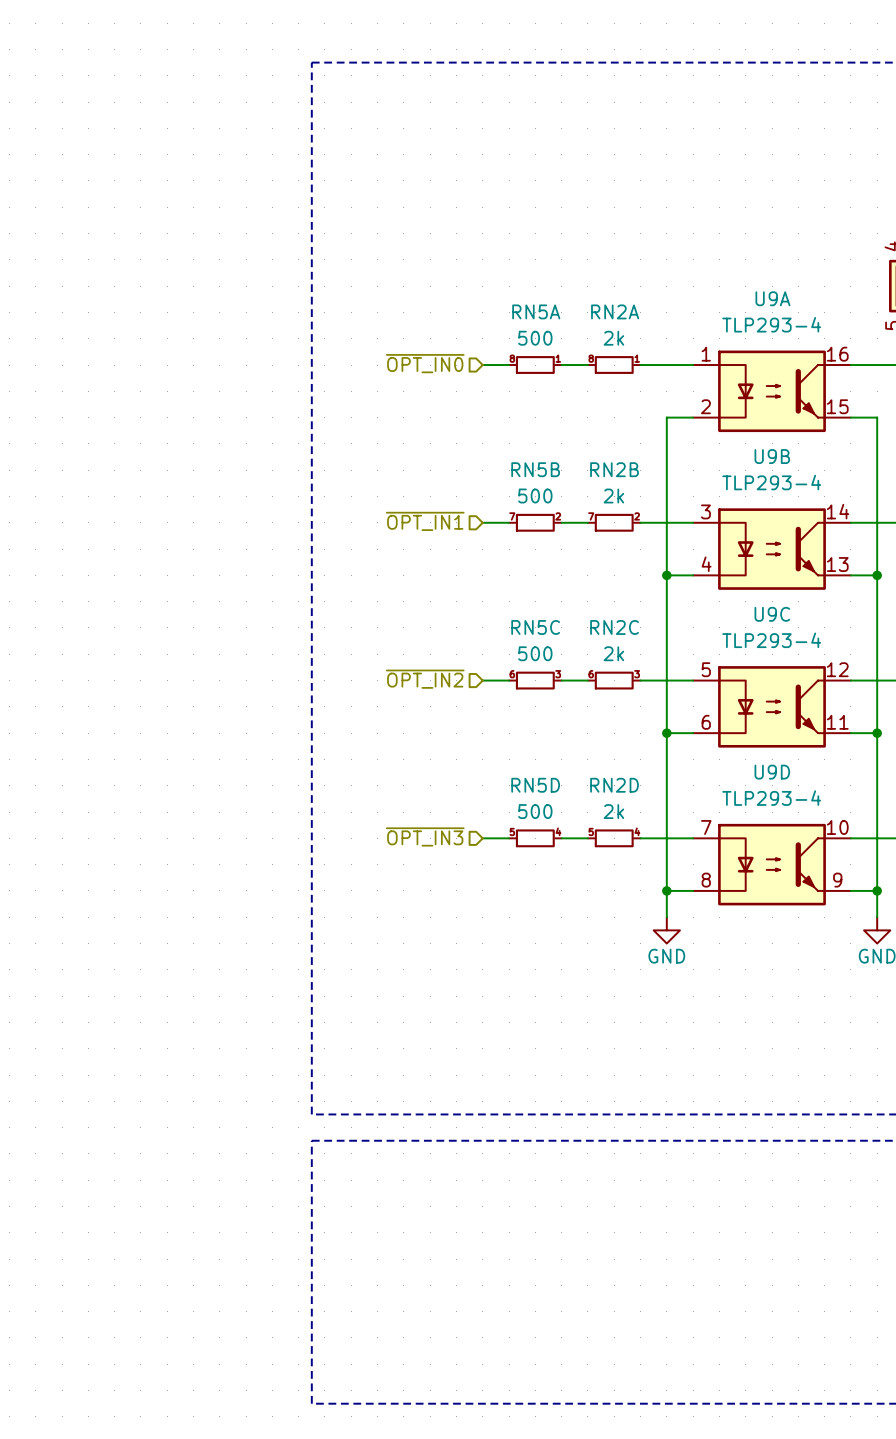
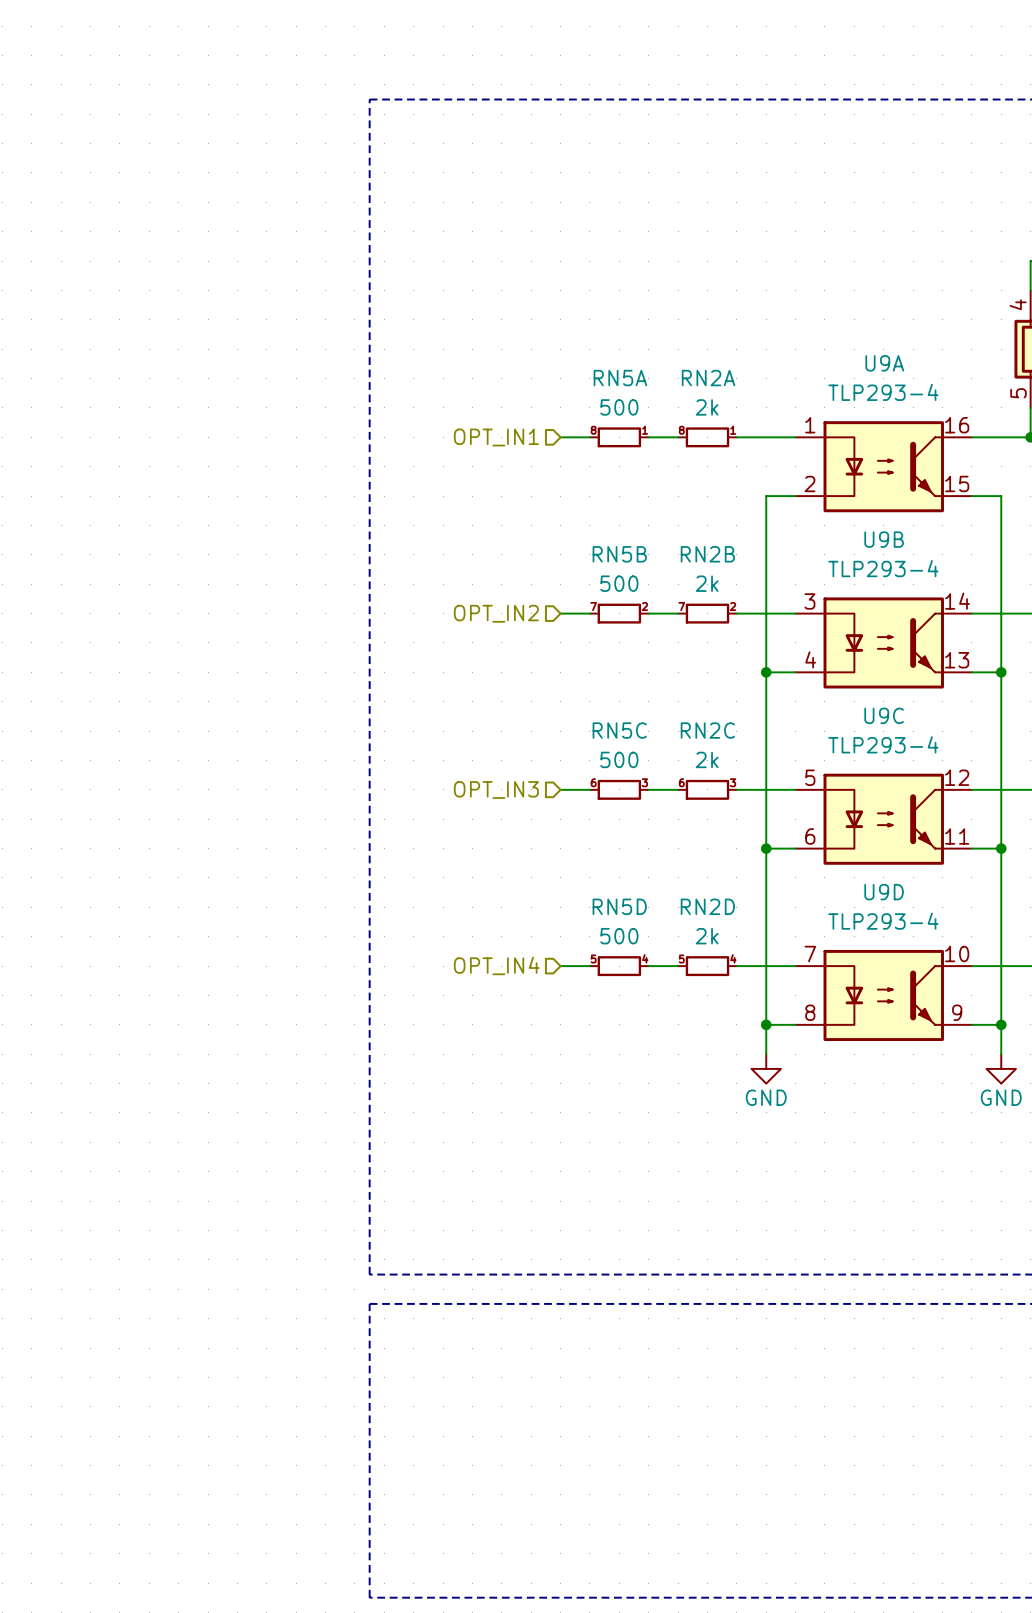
hierarchical label: ~{OPT_IN0} (425, 363) -> OPT_IN1 (496, 437)
hierarchical label: ~{OPT_IN1} (425, 521) -> OPT_IN2 (496, 613)
hierarchical label: ~{OPT_IN2} (425, 679) -> OPT_IN3 (496, 790)
hierarchical label: ~{OPT_IN3} (425, 836) -> OPT_IN4 (496, 965)

